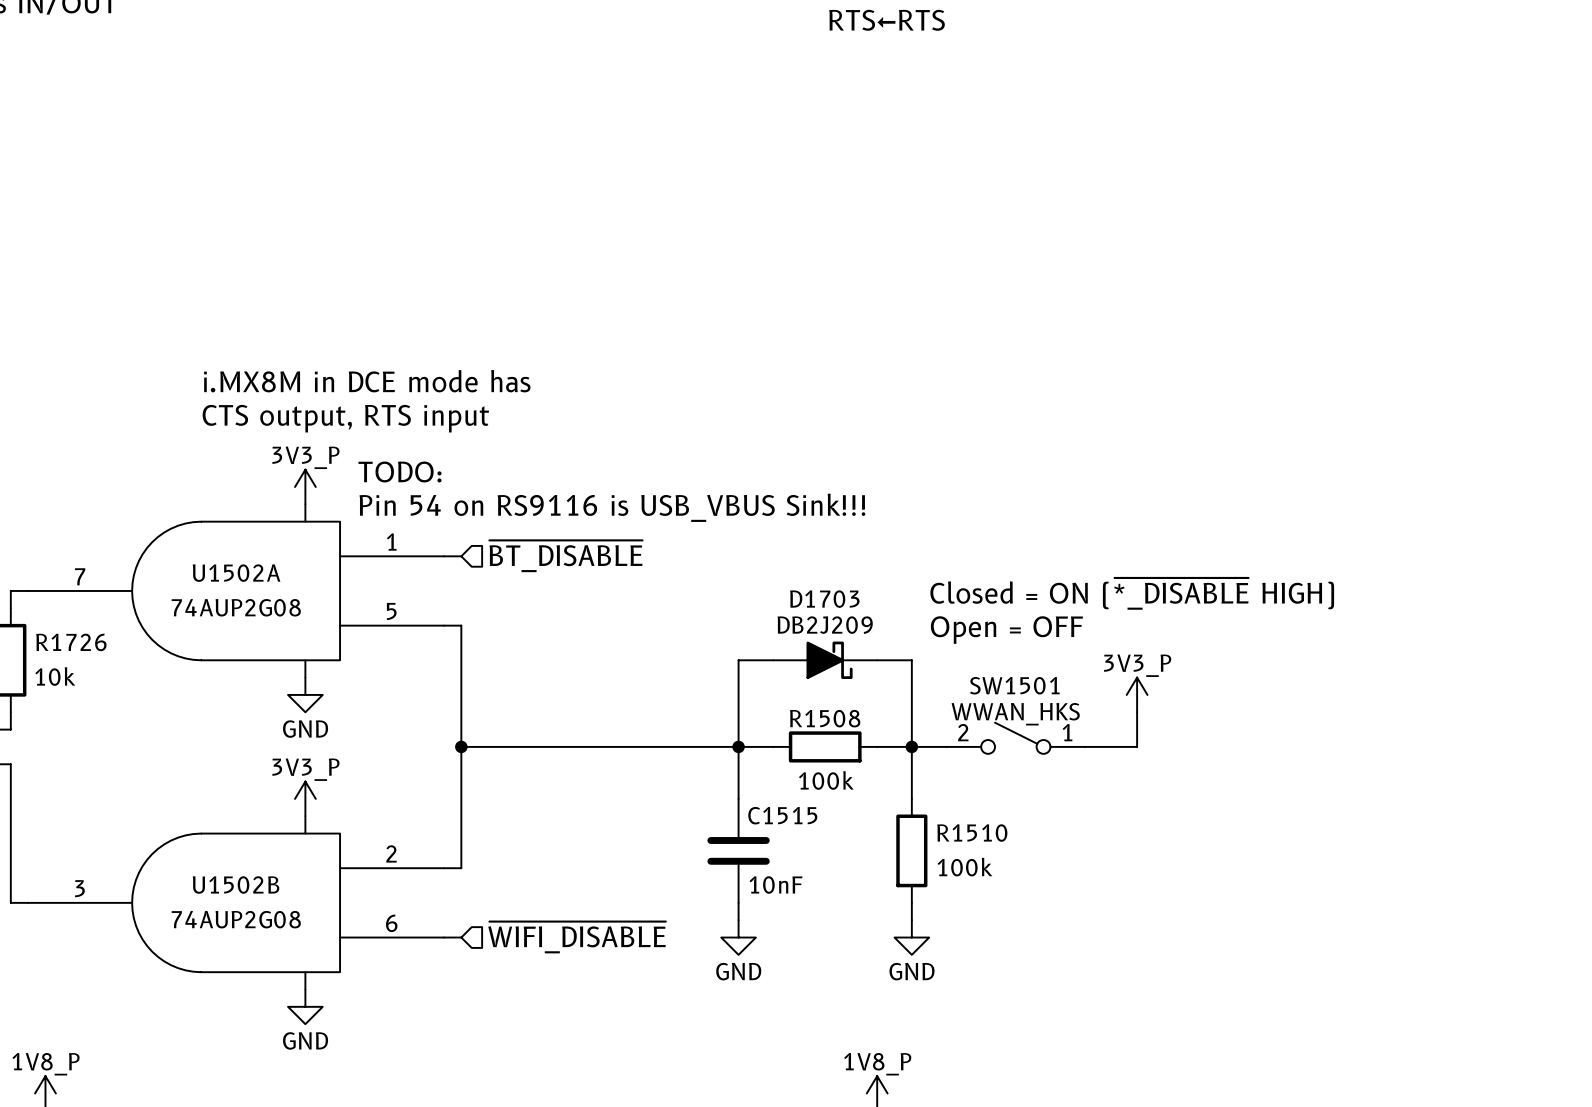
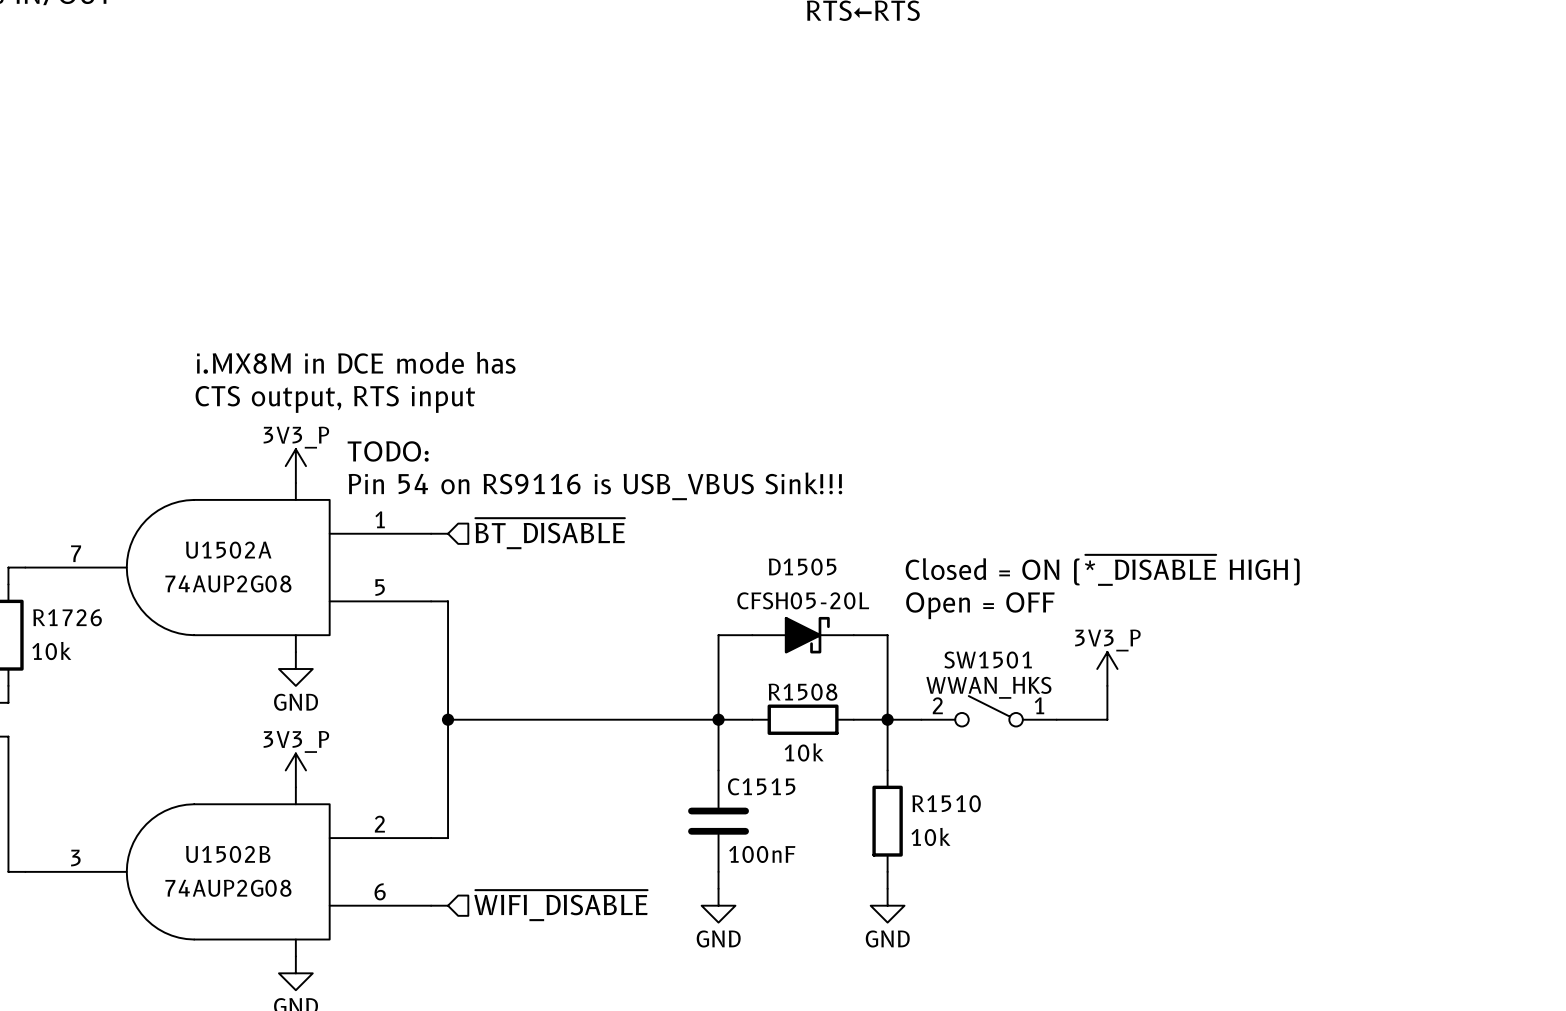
D1703: DB2J209 (825, 660) -> none
D1505: none -> CFSH05-20L (803, 635)
R1508 value: 100k (826, 780) -> 10k (804, 752)
R1510 value: 100k (964, 867) -> 10k (930, 836)
C1515 value: 10nF (775, 884) -> 100nF (762, 854)

